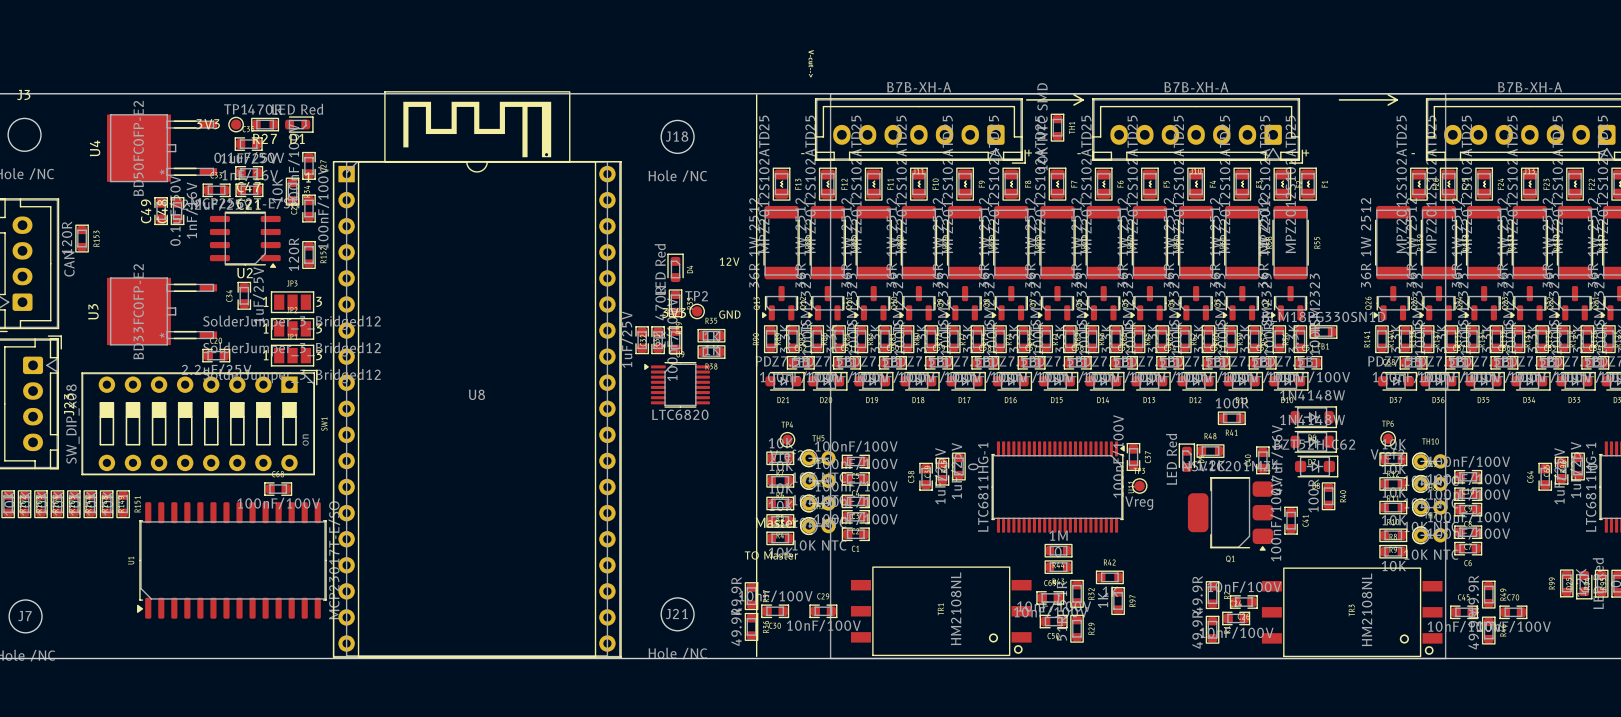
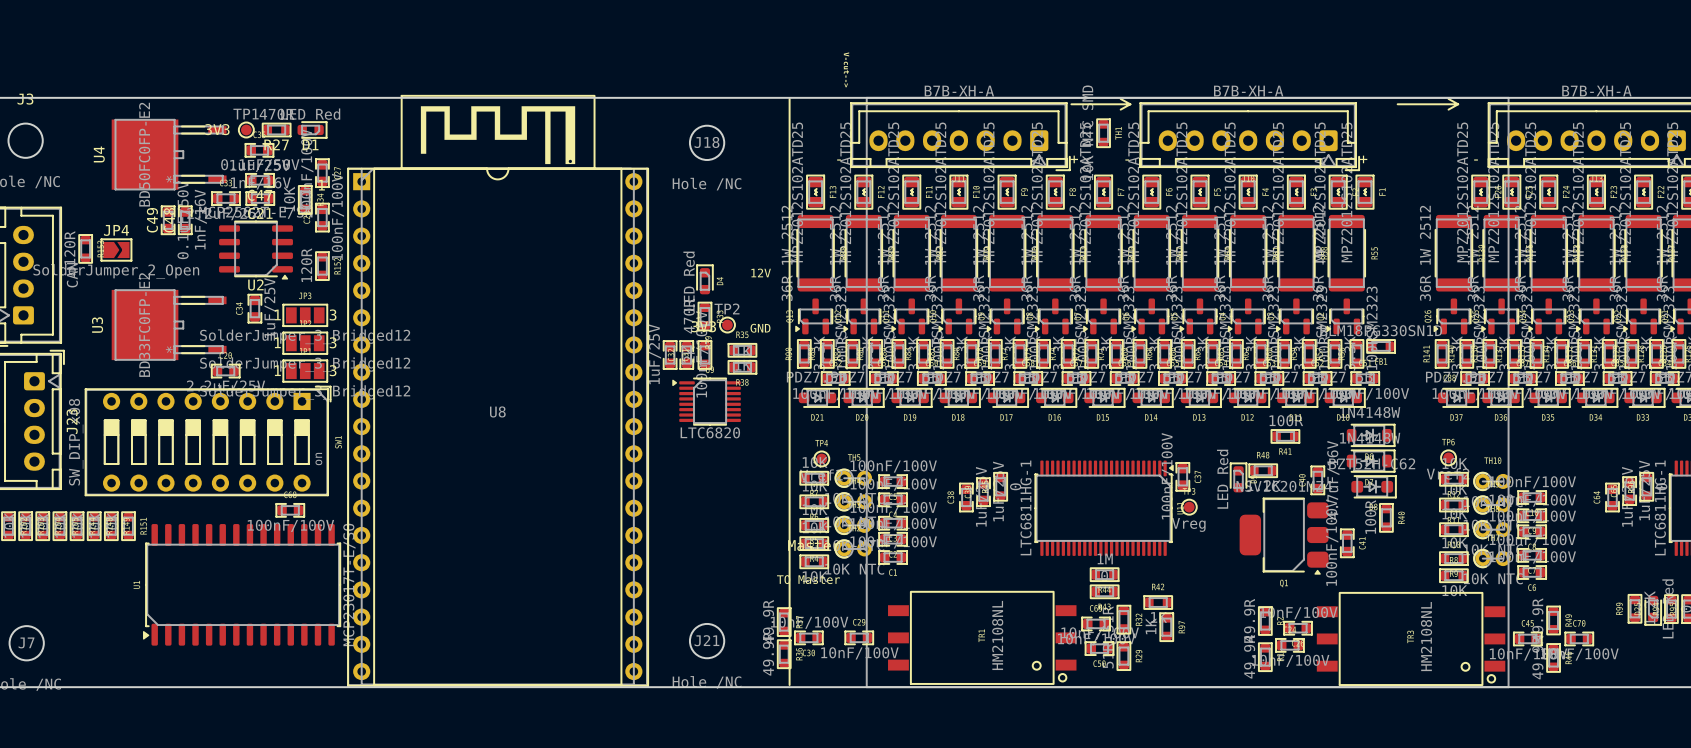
JP4: none -> SolderJumper_2_Open (116, 250)

